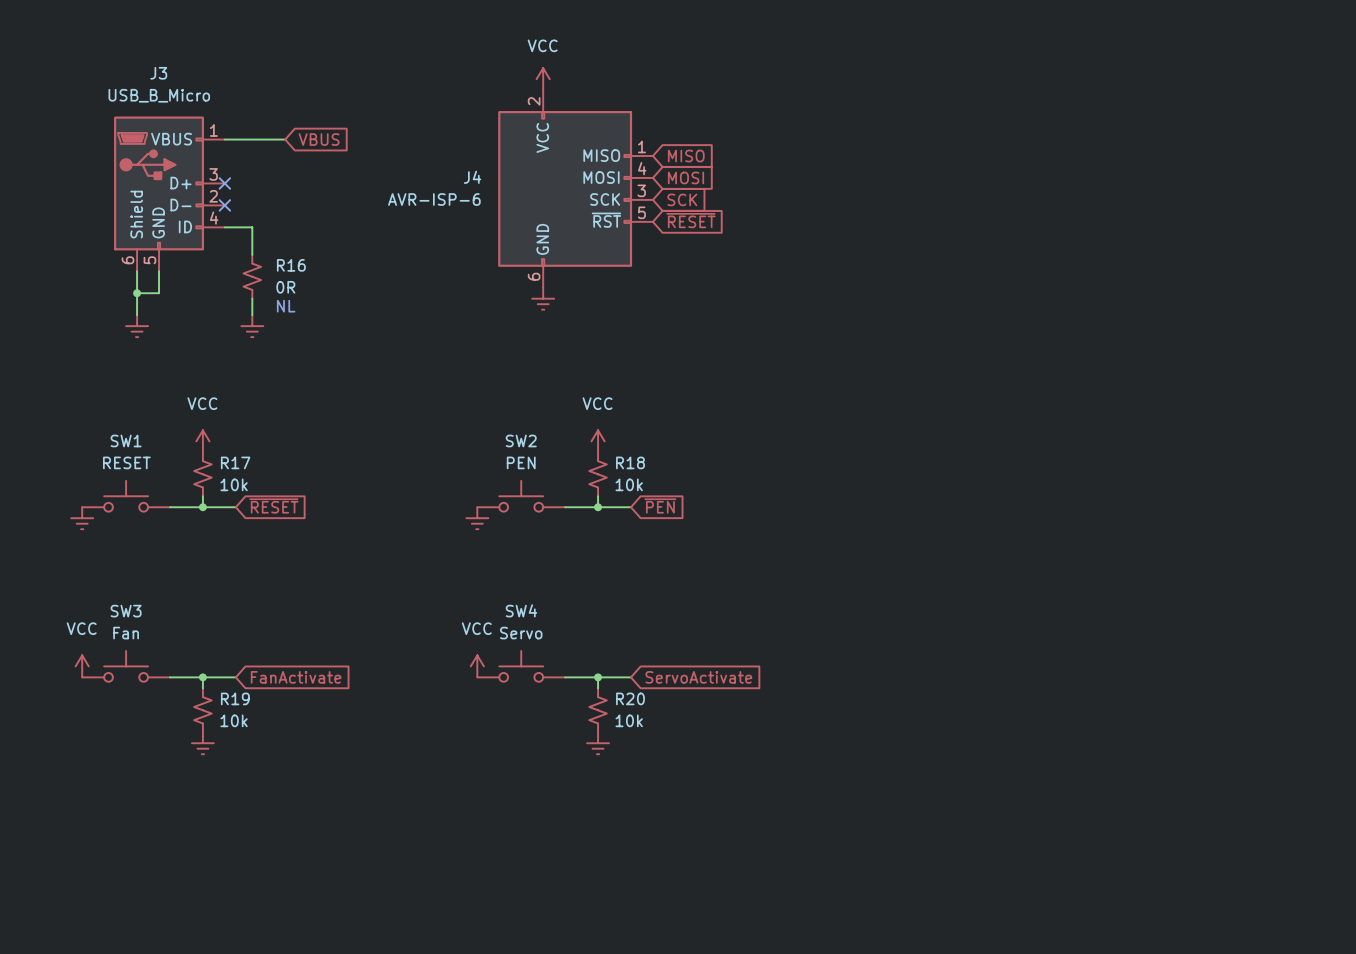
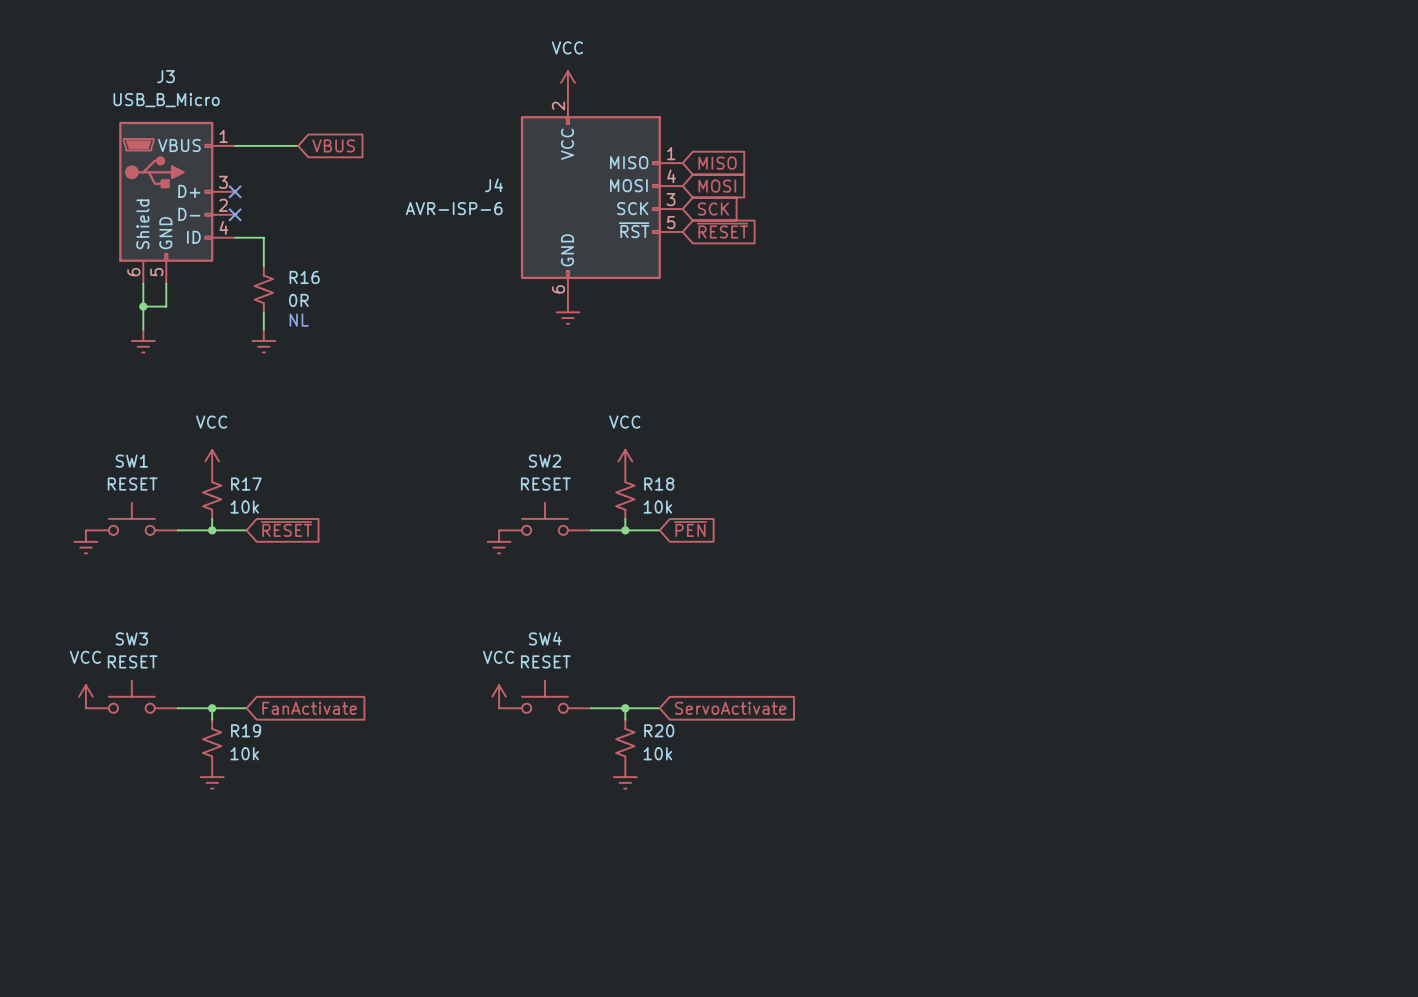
SW2 value: PEN (521, 462) -> RESET (545, 484)
SW3 value: Fan (126, 633) -> RESET (132, 661)
SW4 value: Servo (521, 633) -> RESET (545, 661)

